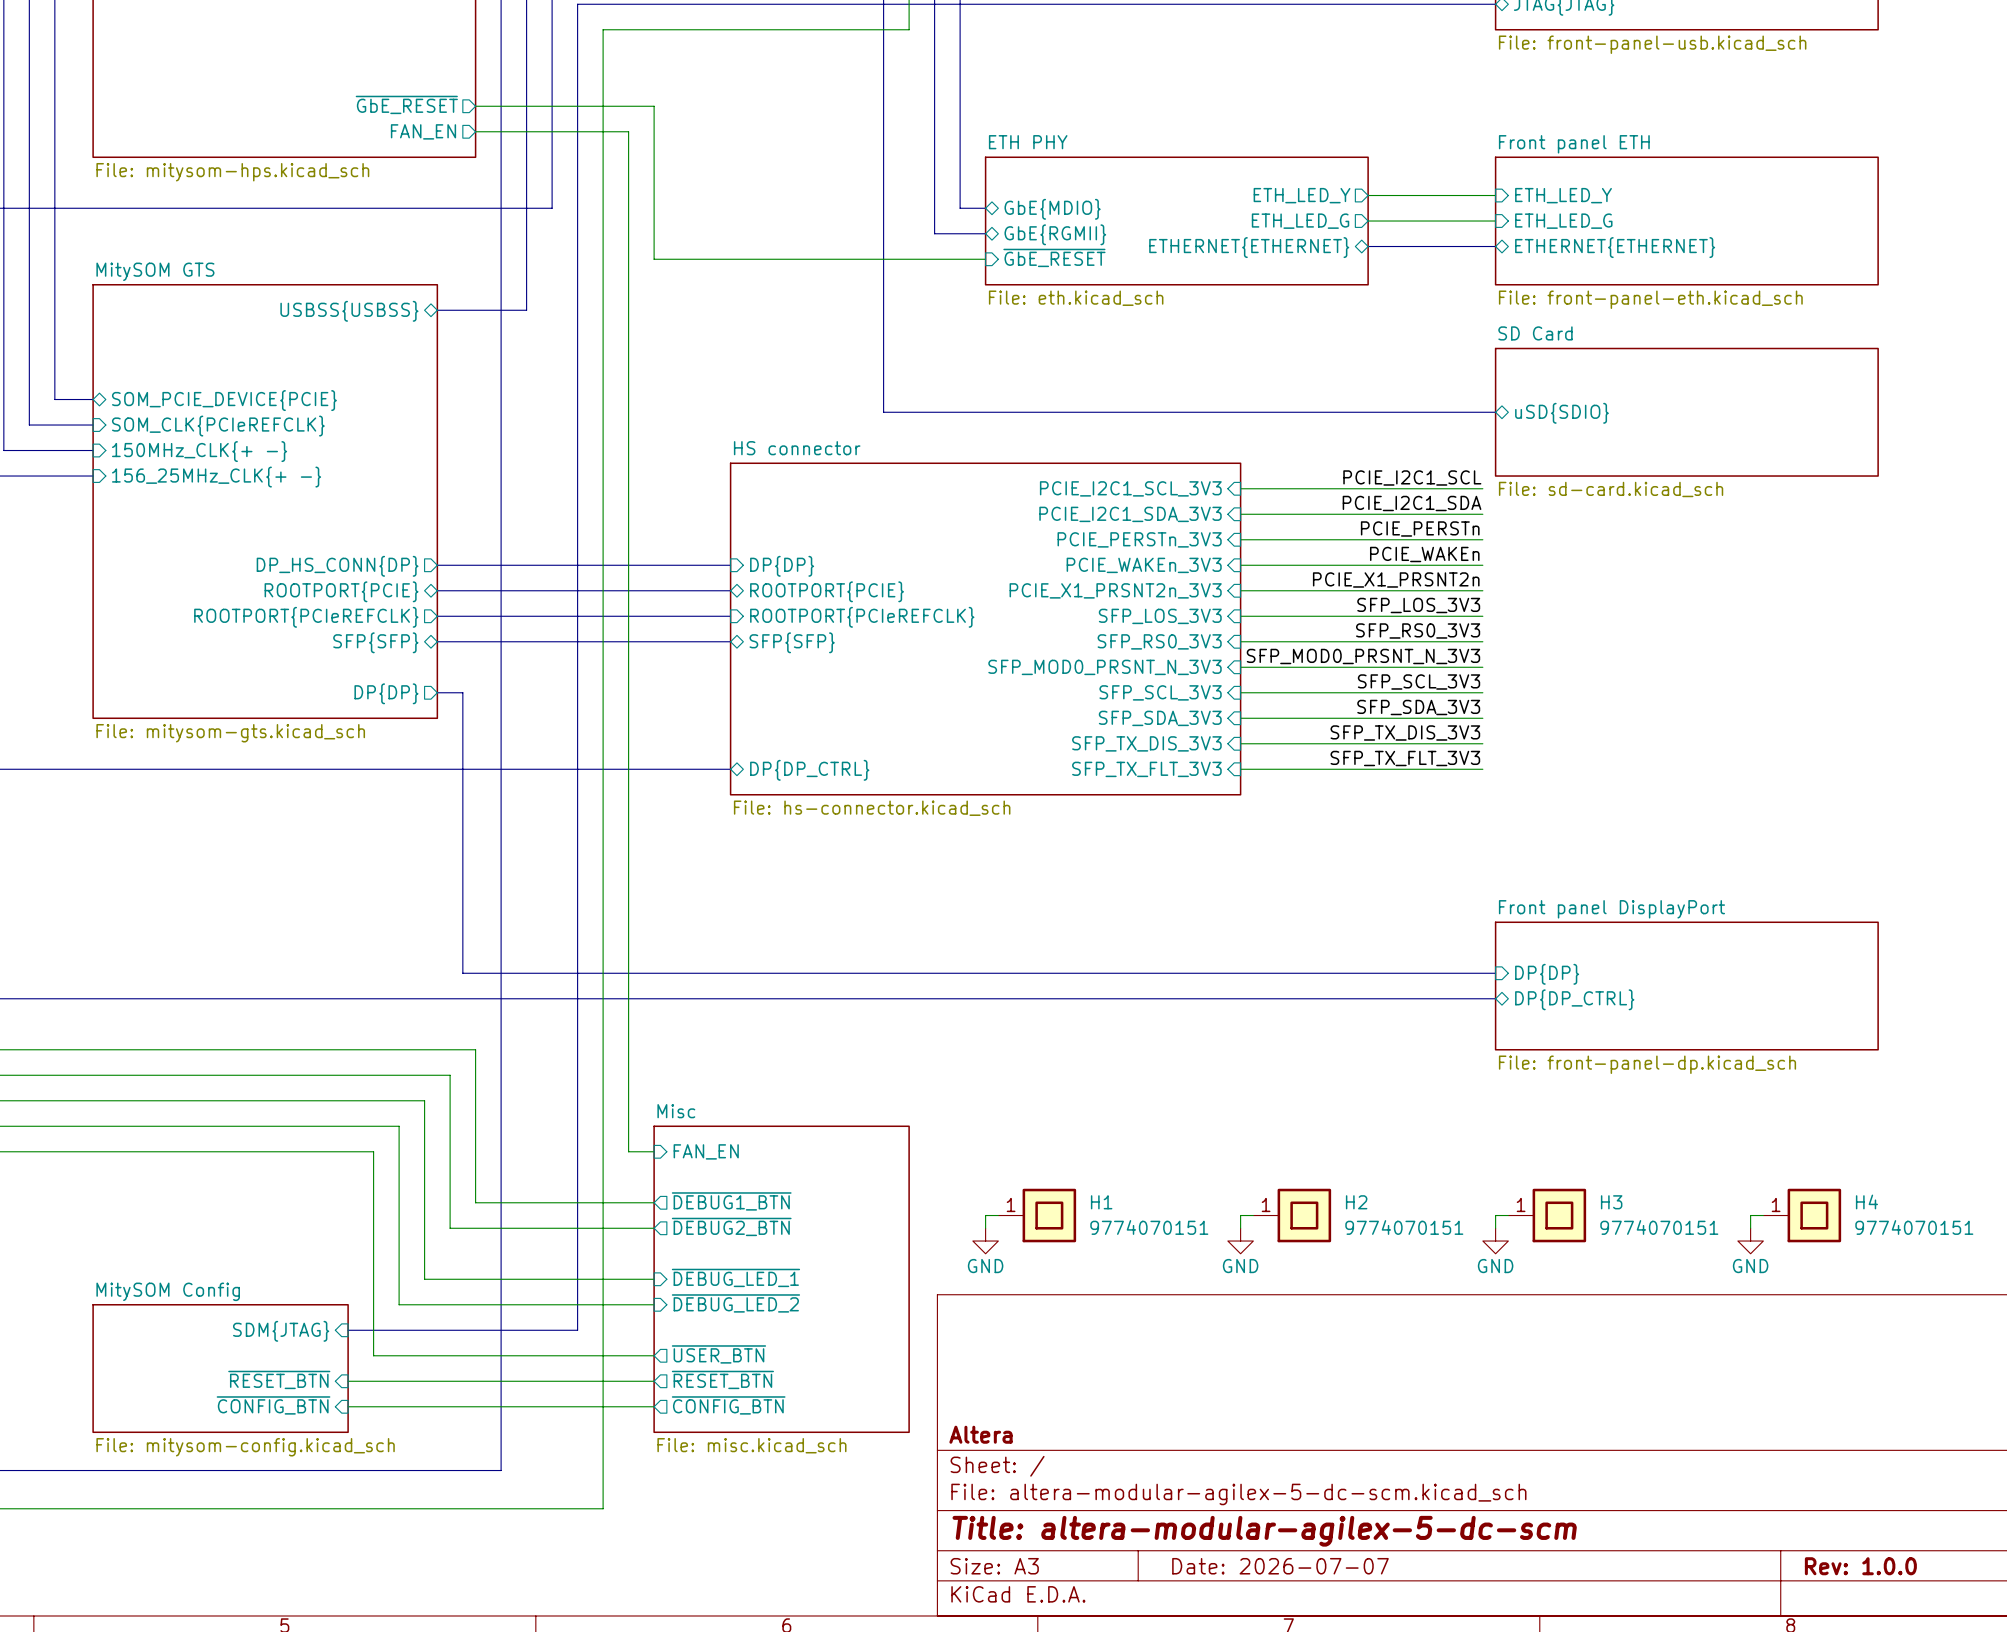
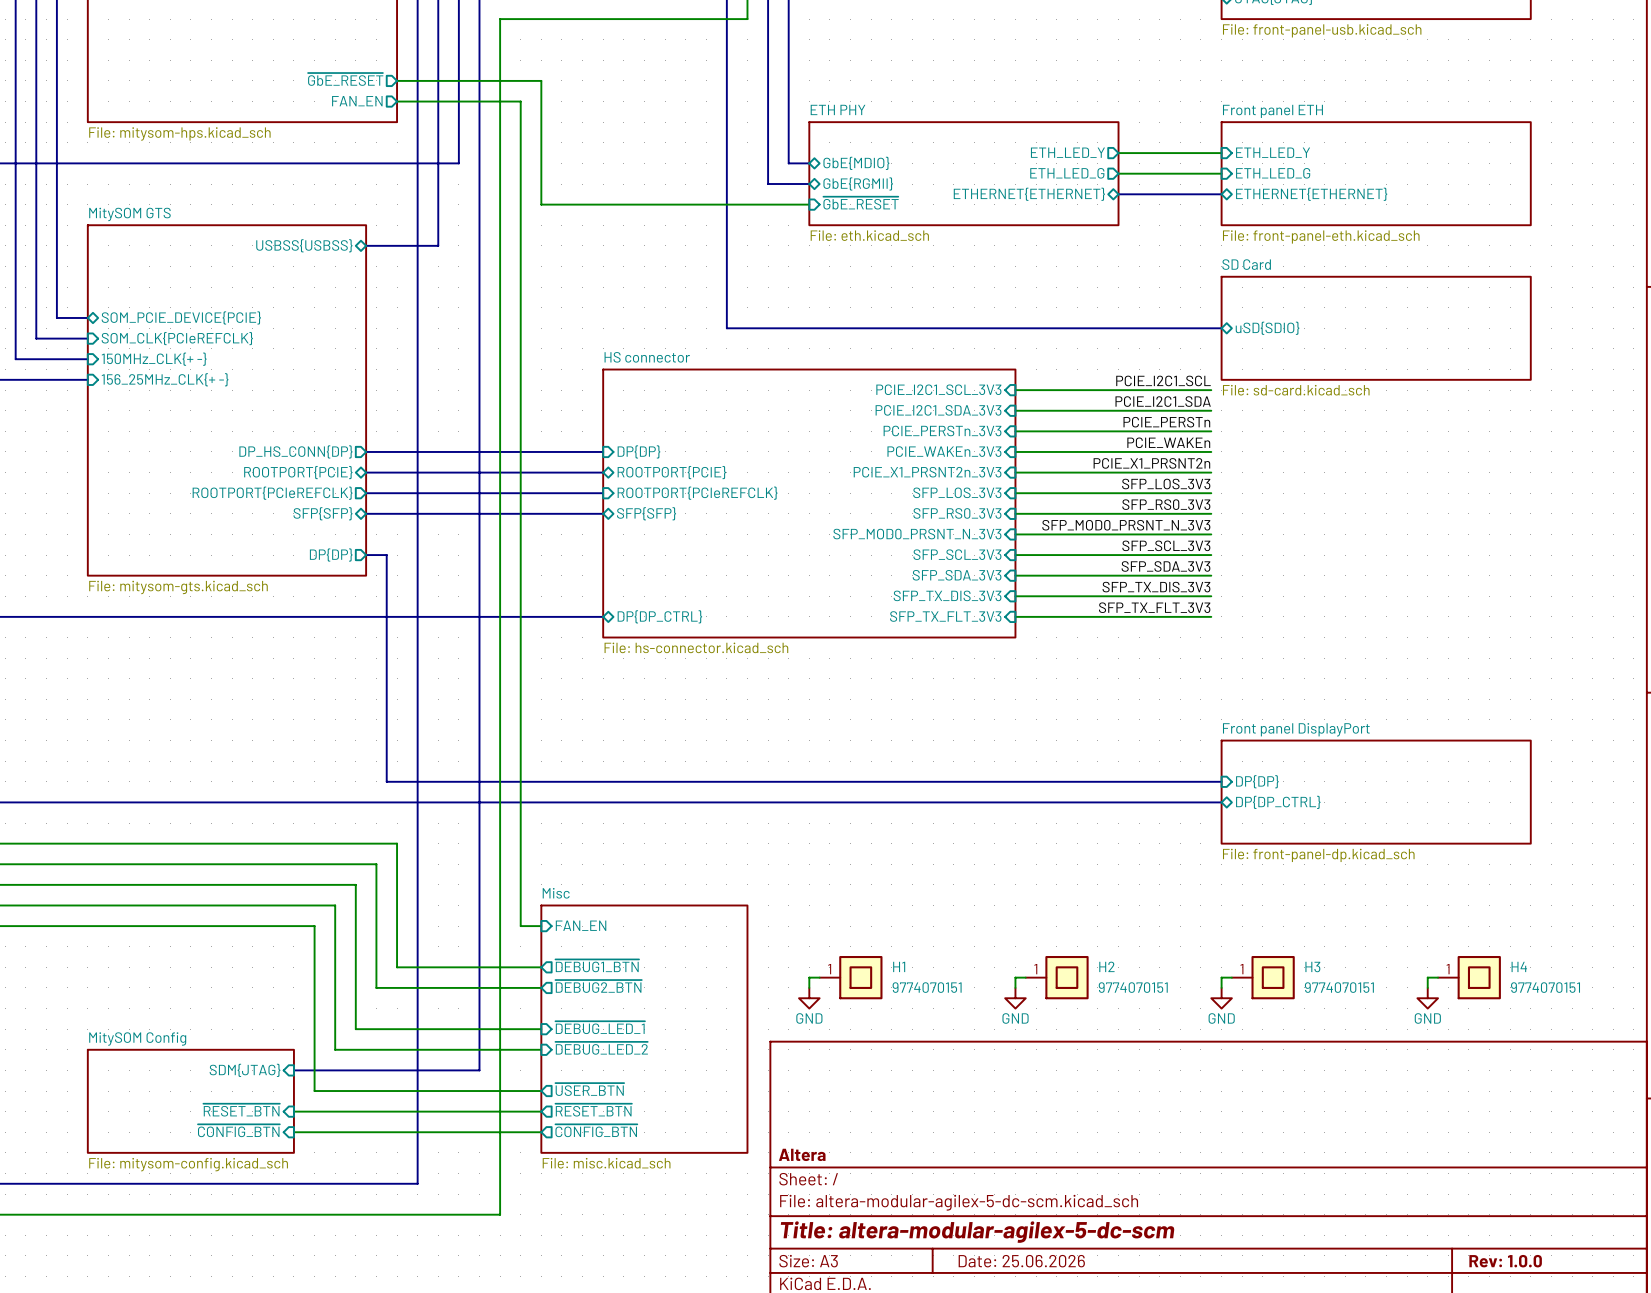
title block: Date: 2026-07-07 (1280, 1566) -> Date: 25.06.2026 (1021, 1261)

